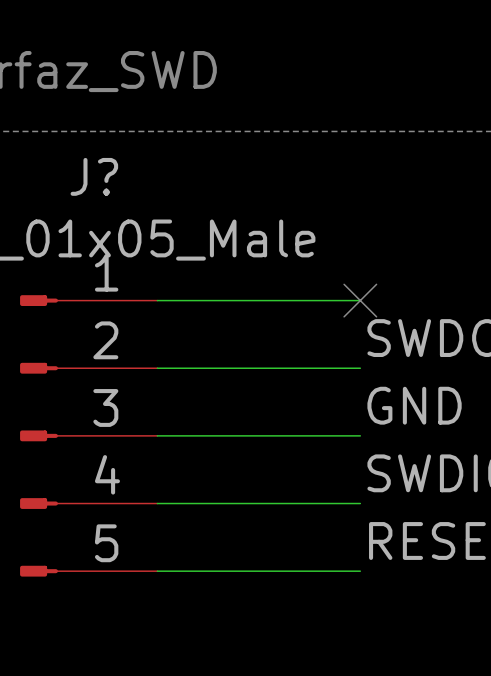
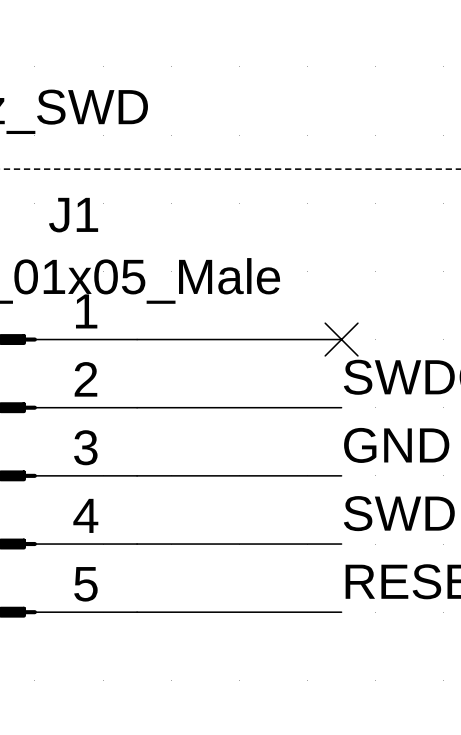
J? name: J? (94, 176) -> J1 (73, 215)

